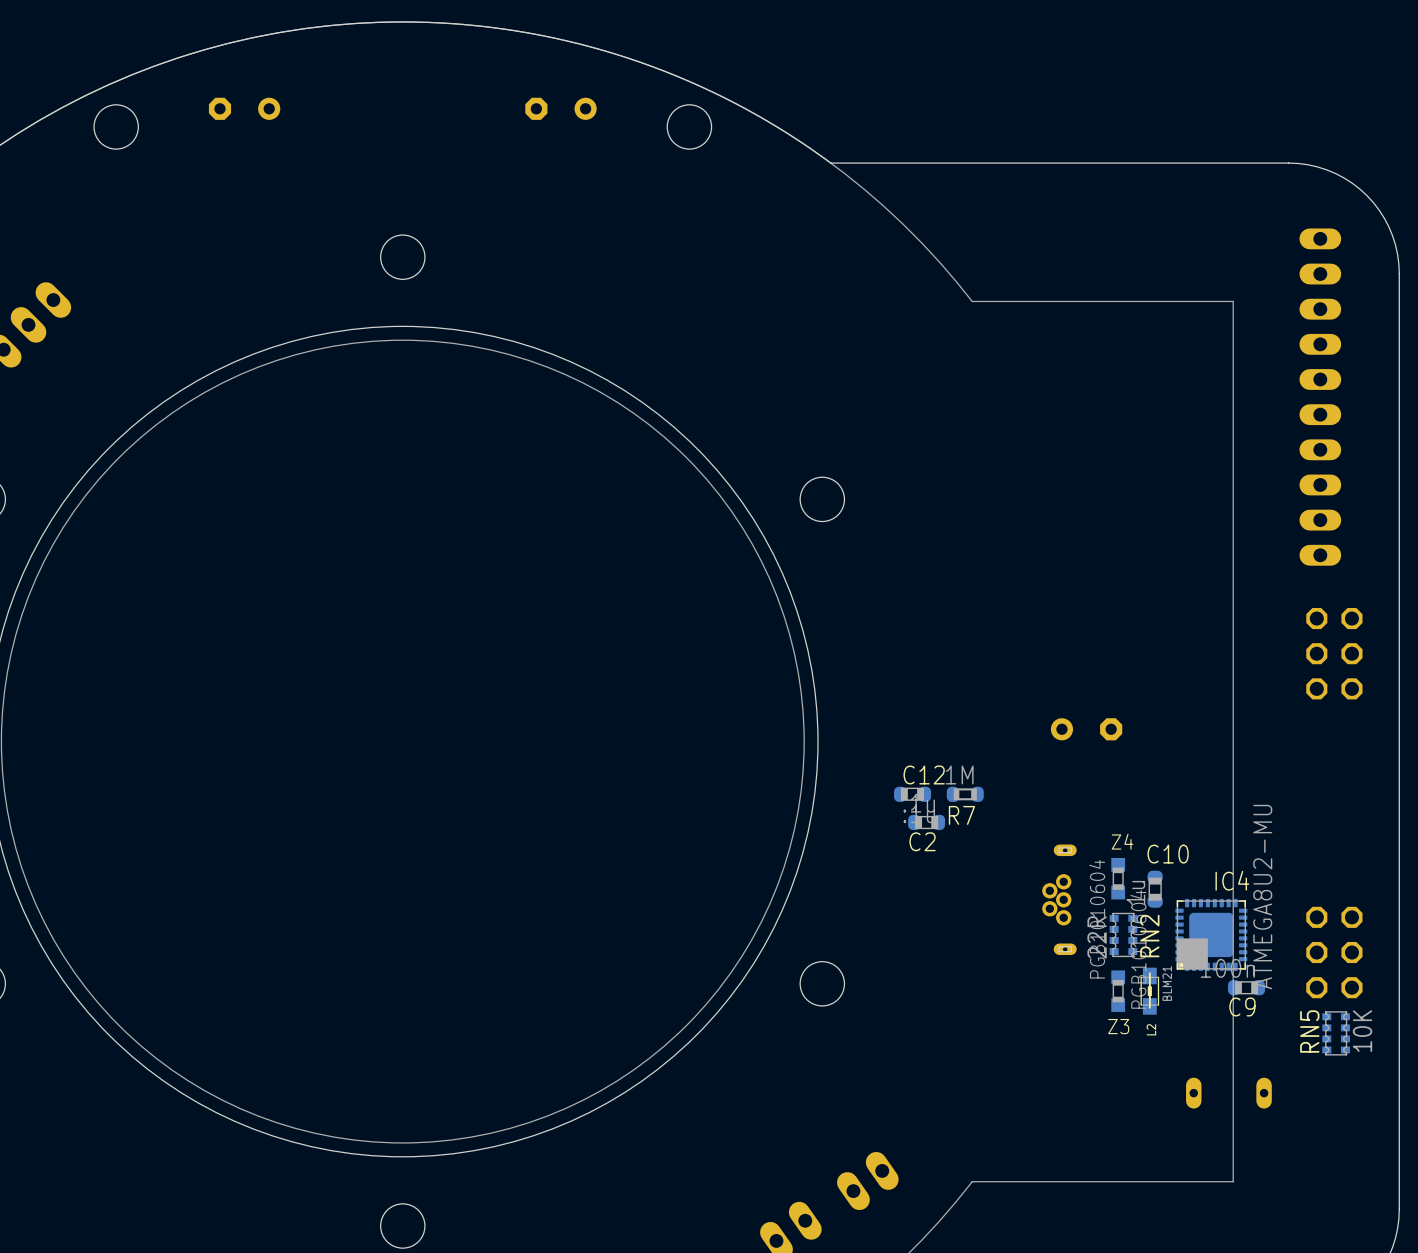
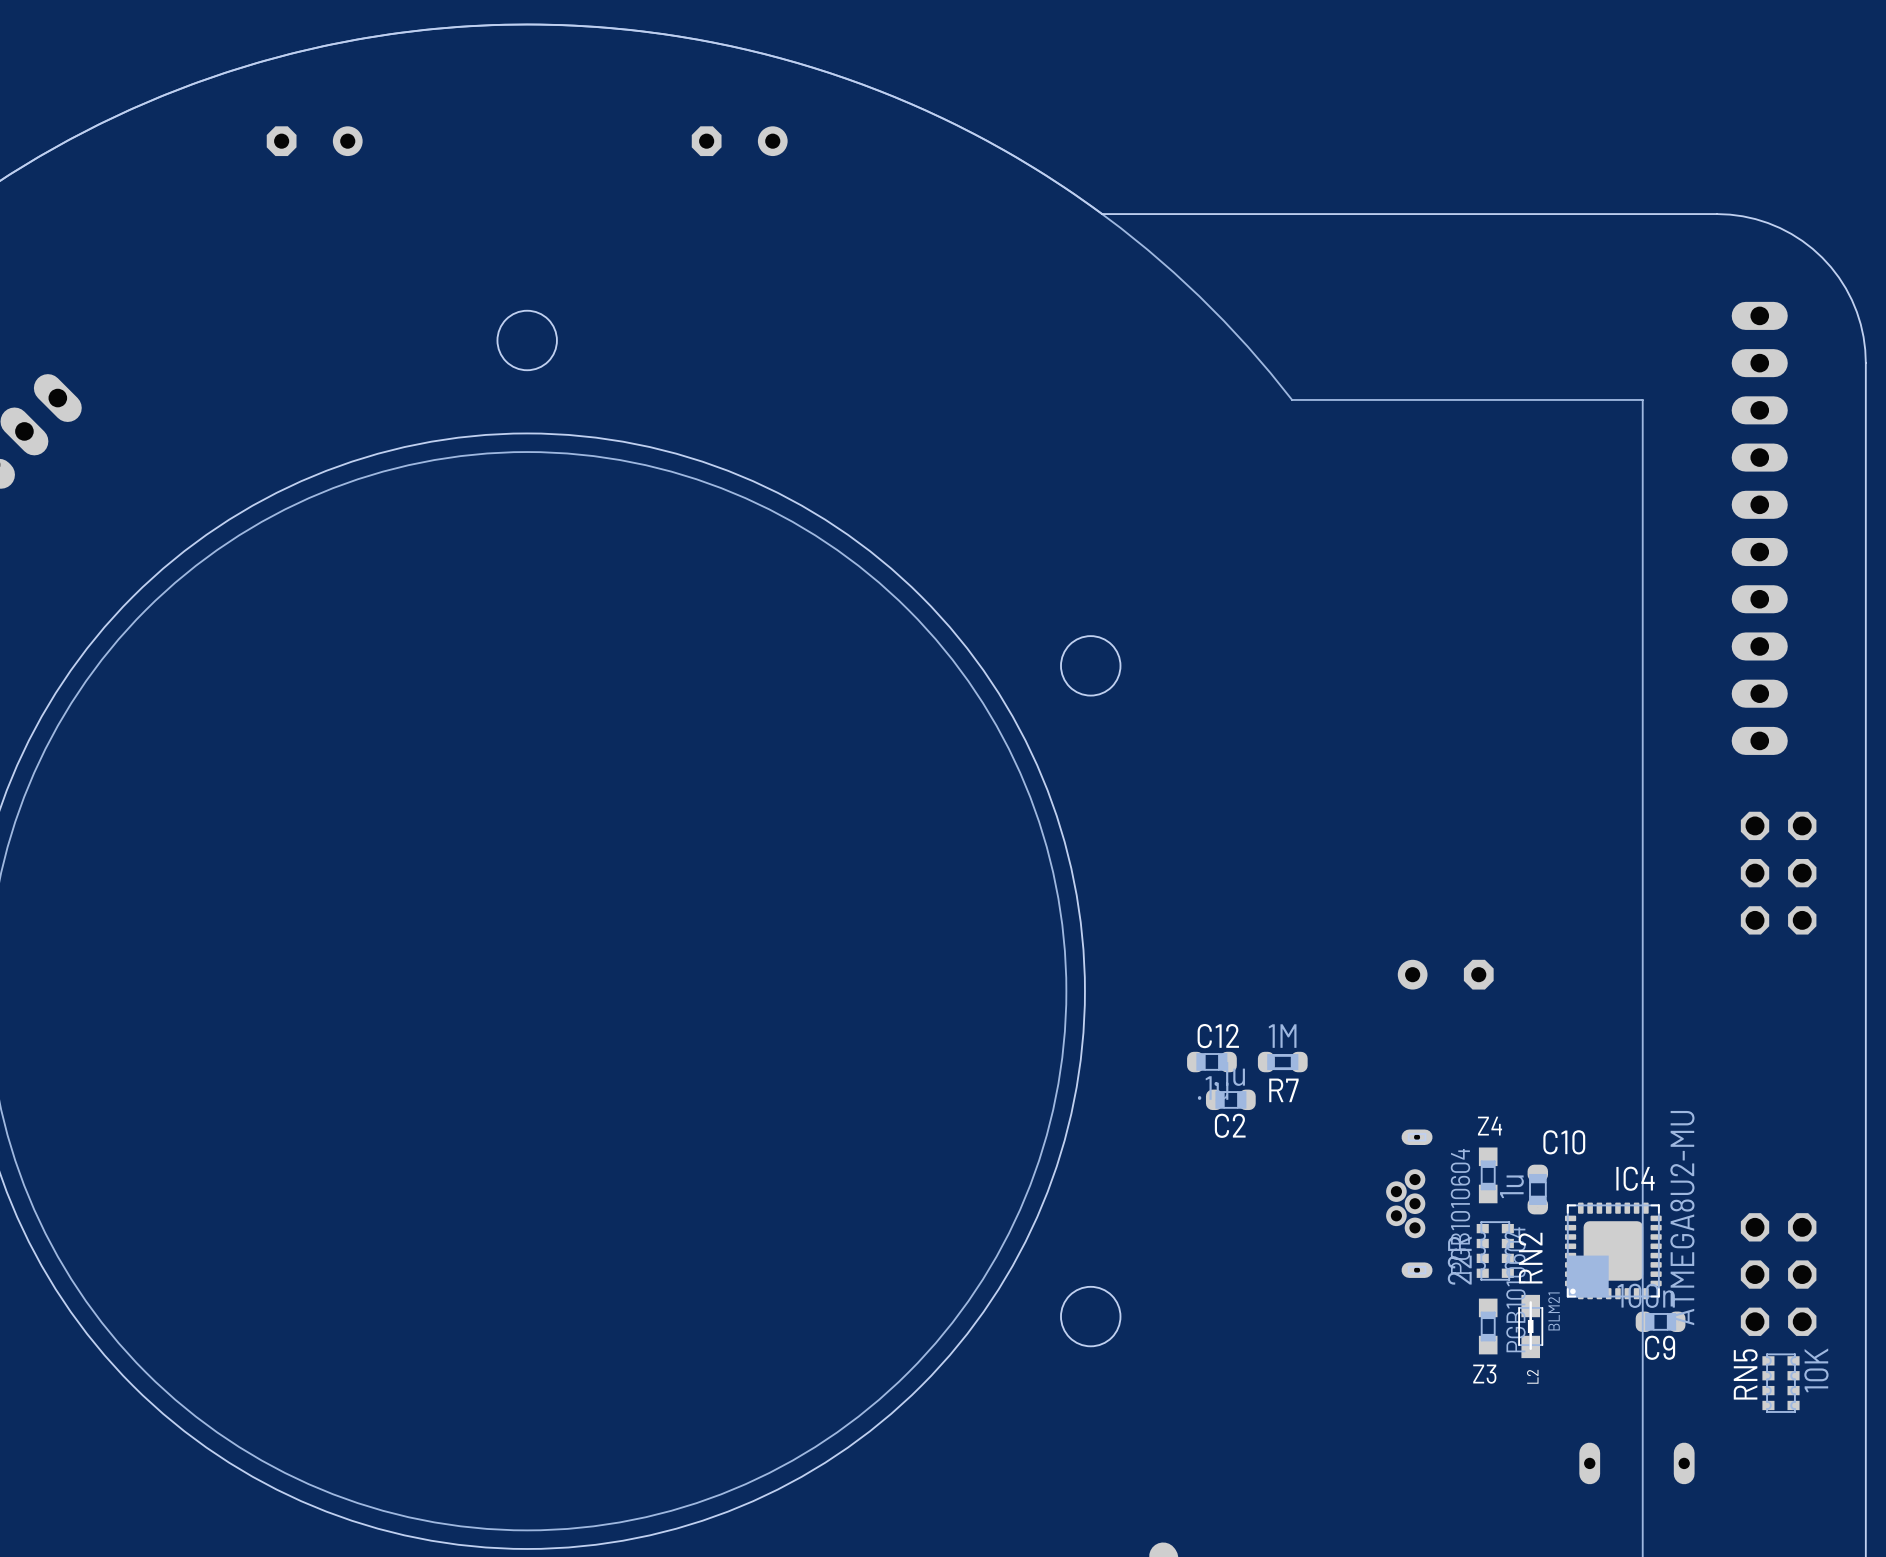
round board edge: [94, 104, 139, 150] -> none
round board edge: [667, 104, 712, 150] -> none

